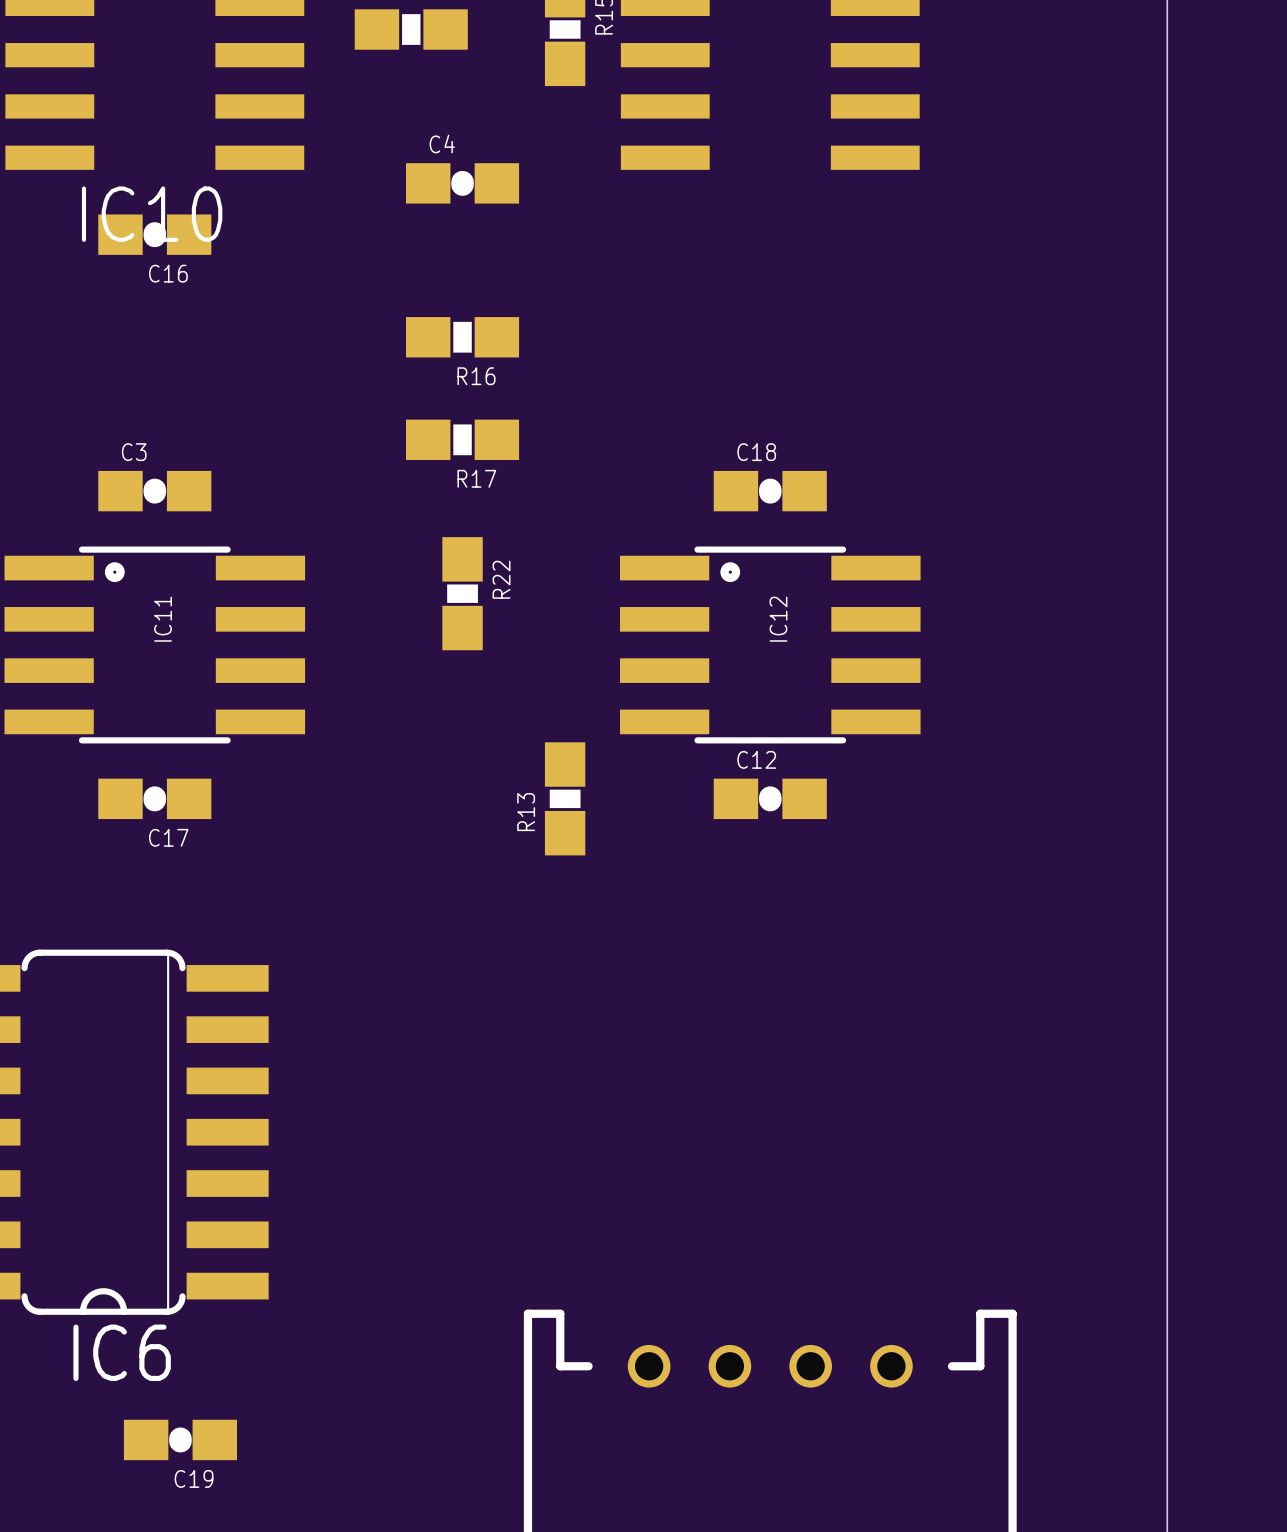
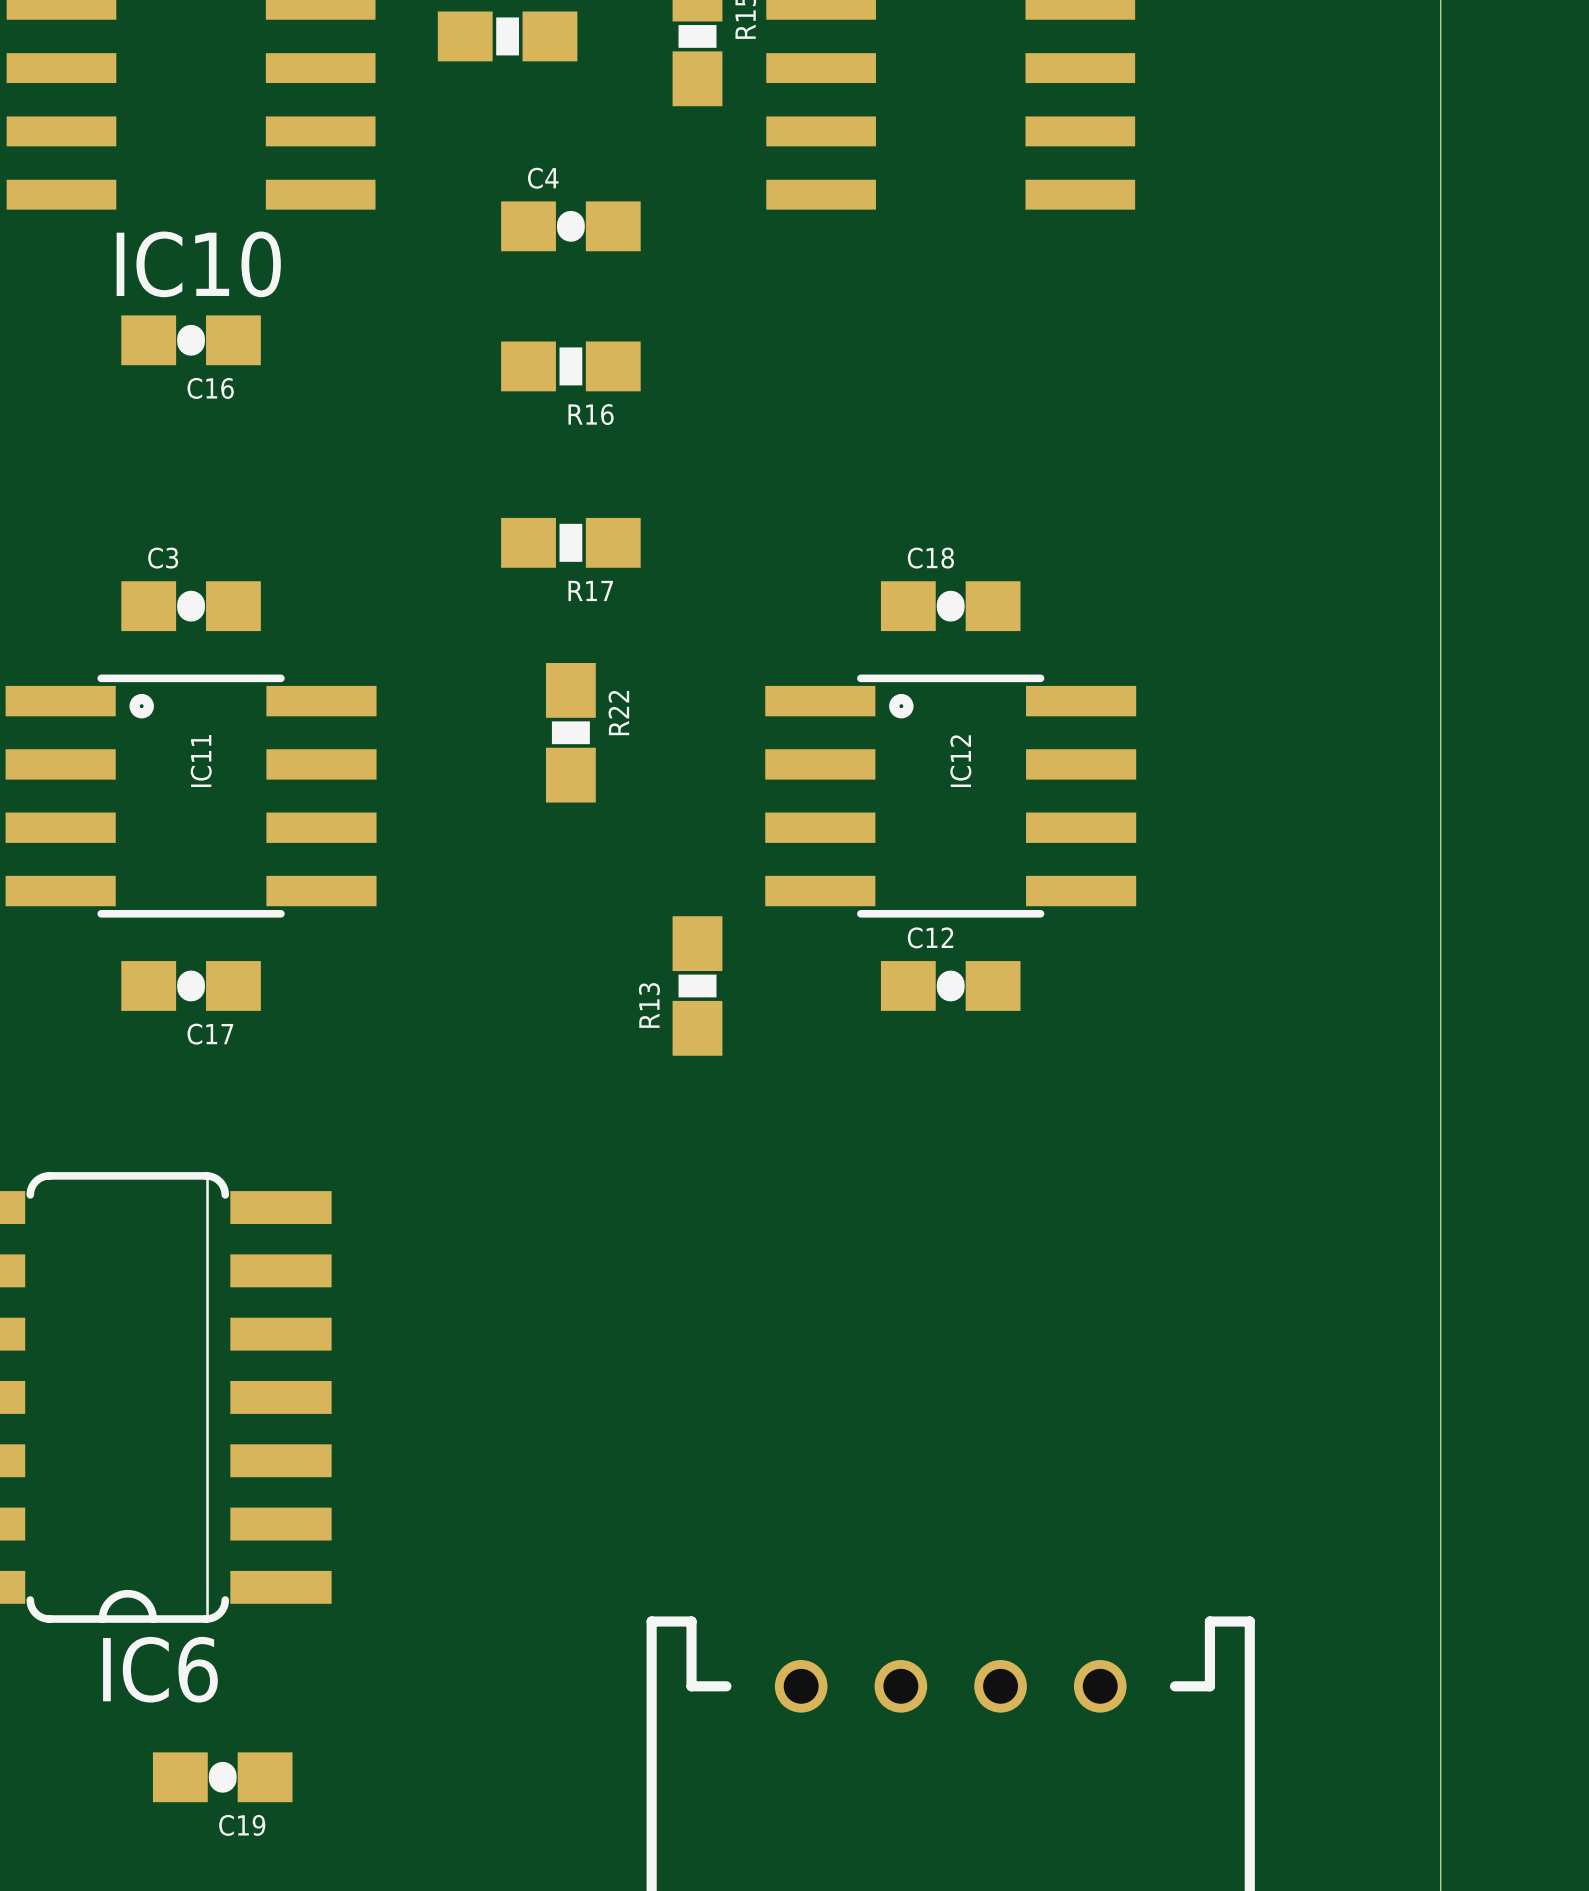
C16 position: (154, 234) -> (191, 340)
R16 position: (462, 337) -> (570, 366)

